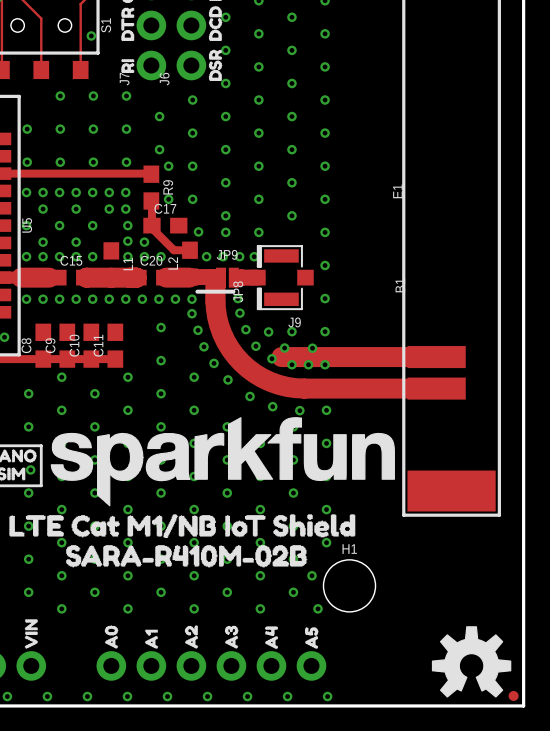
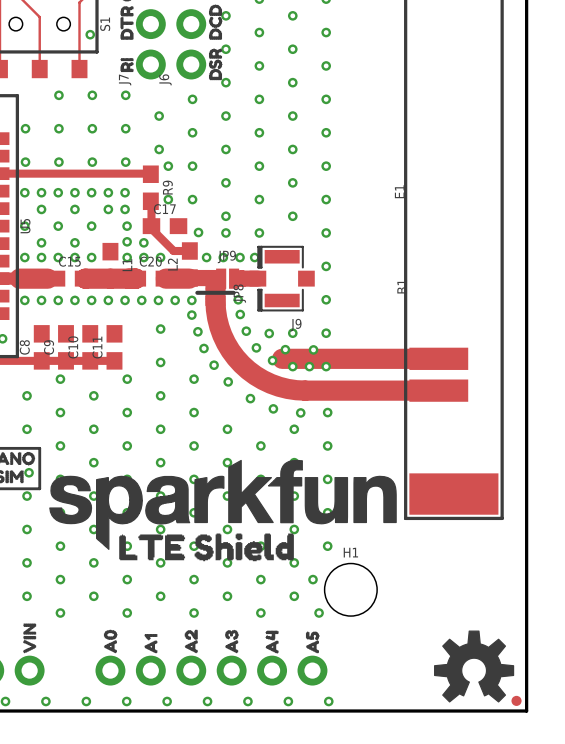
drawing position: (222, 461) -> (222, 504)
drawing: [9, 514, 356, 568] -> none
drawing: none -> [119, 533, 294, 562]

